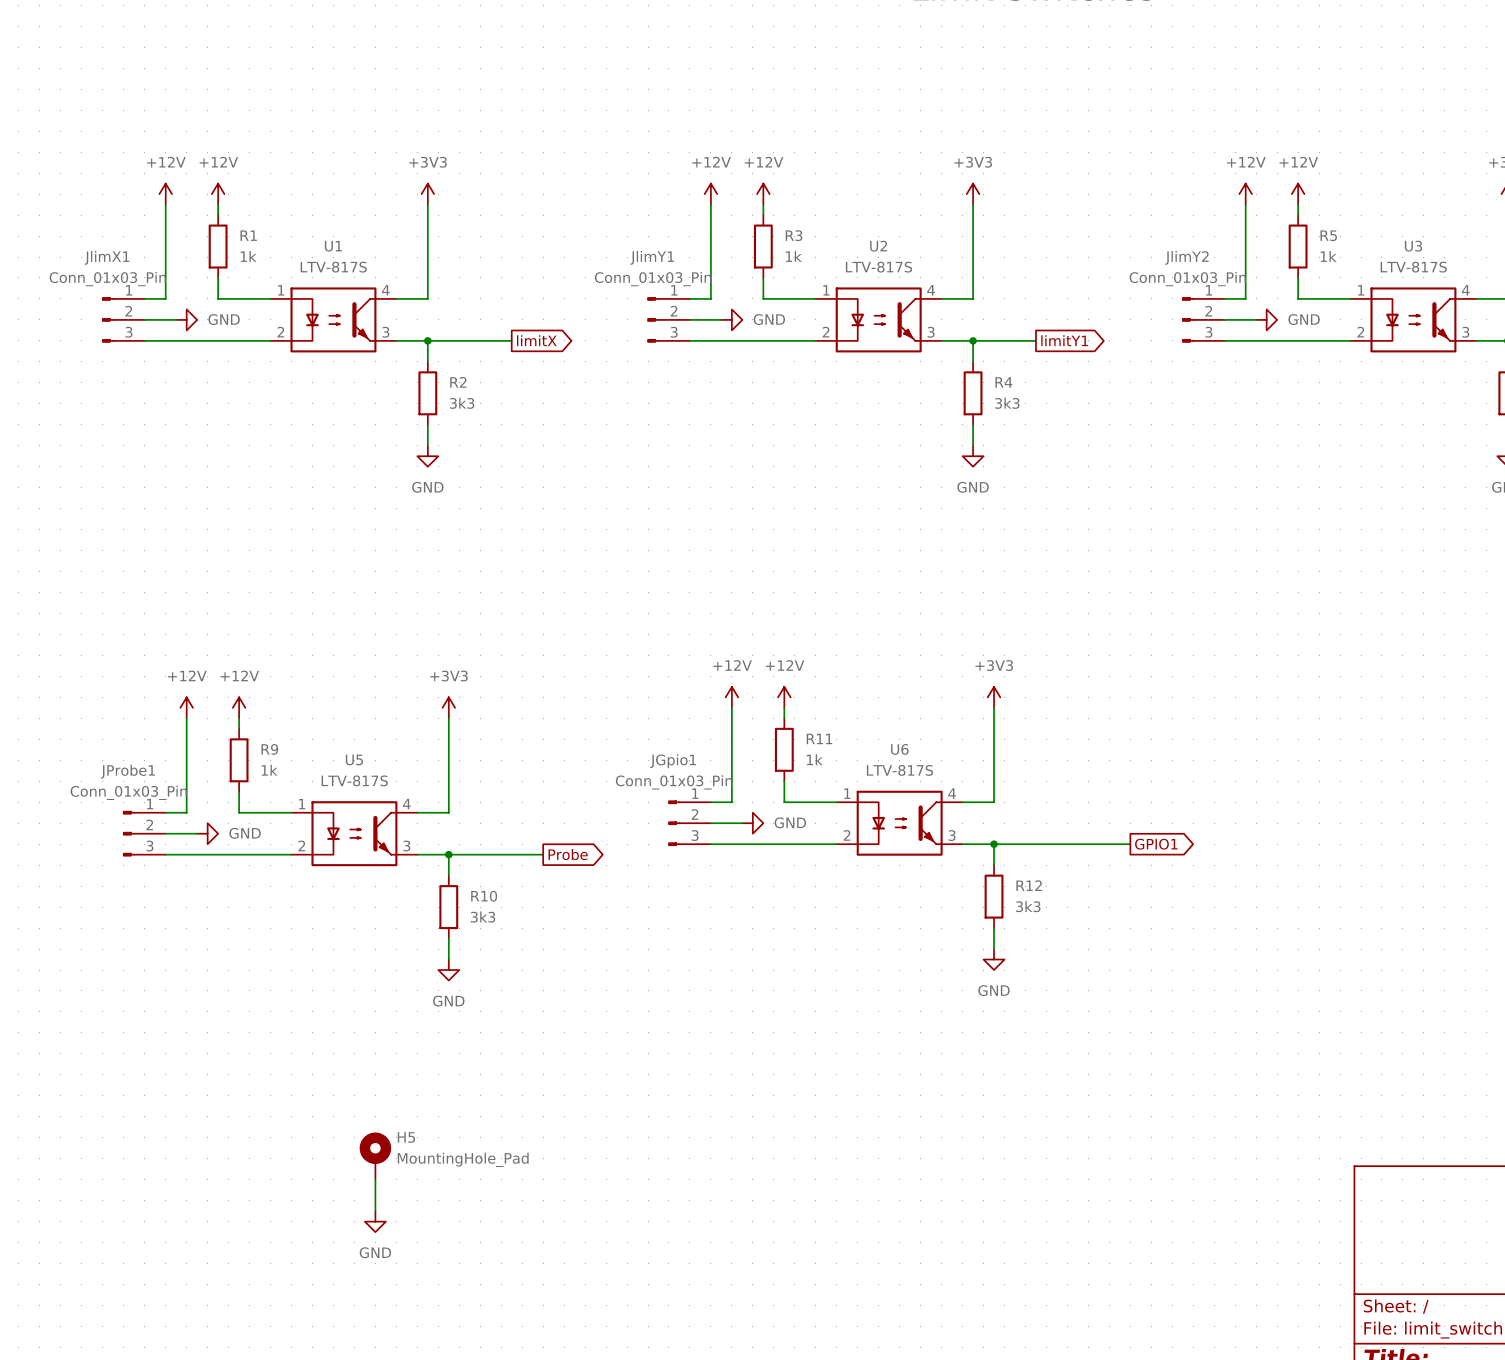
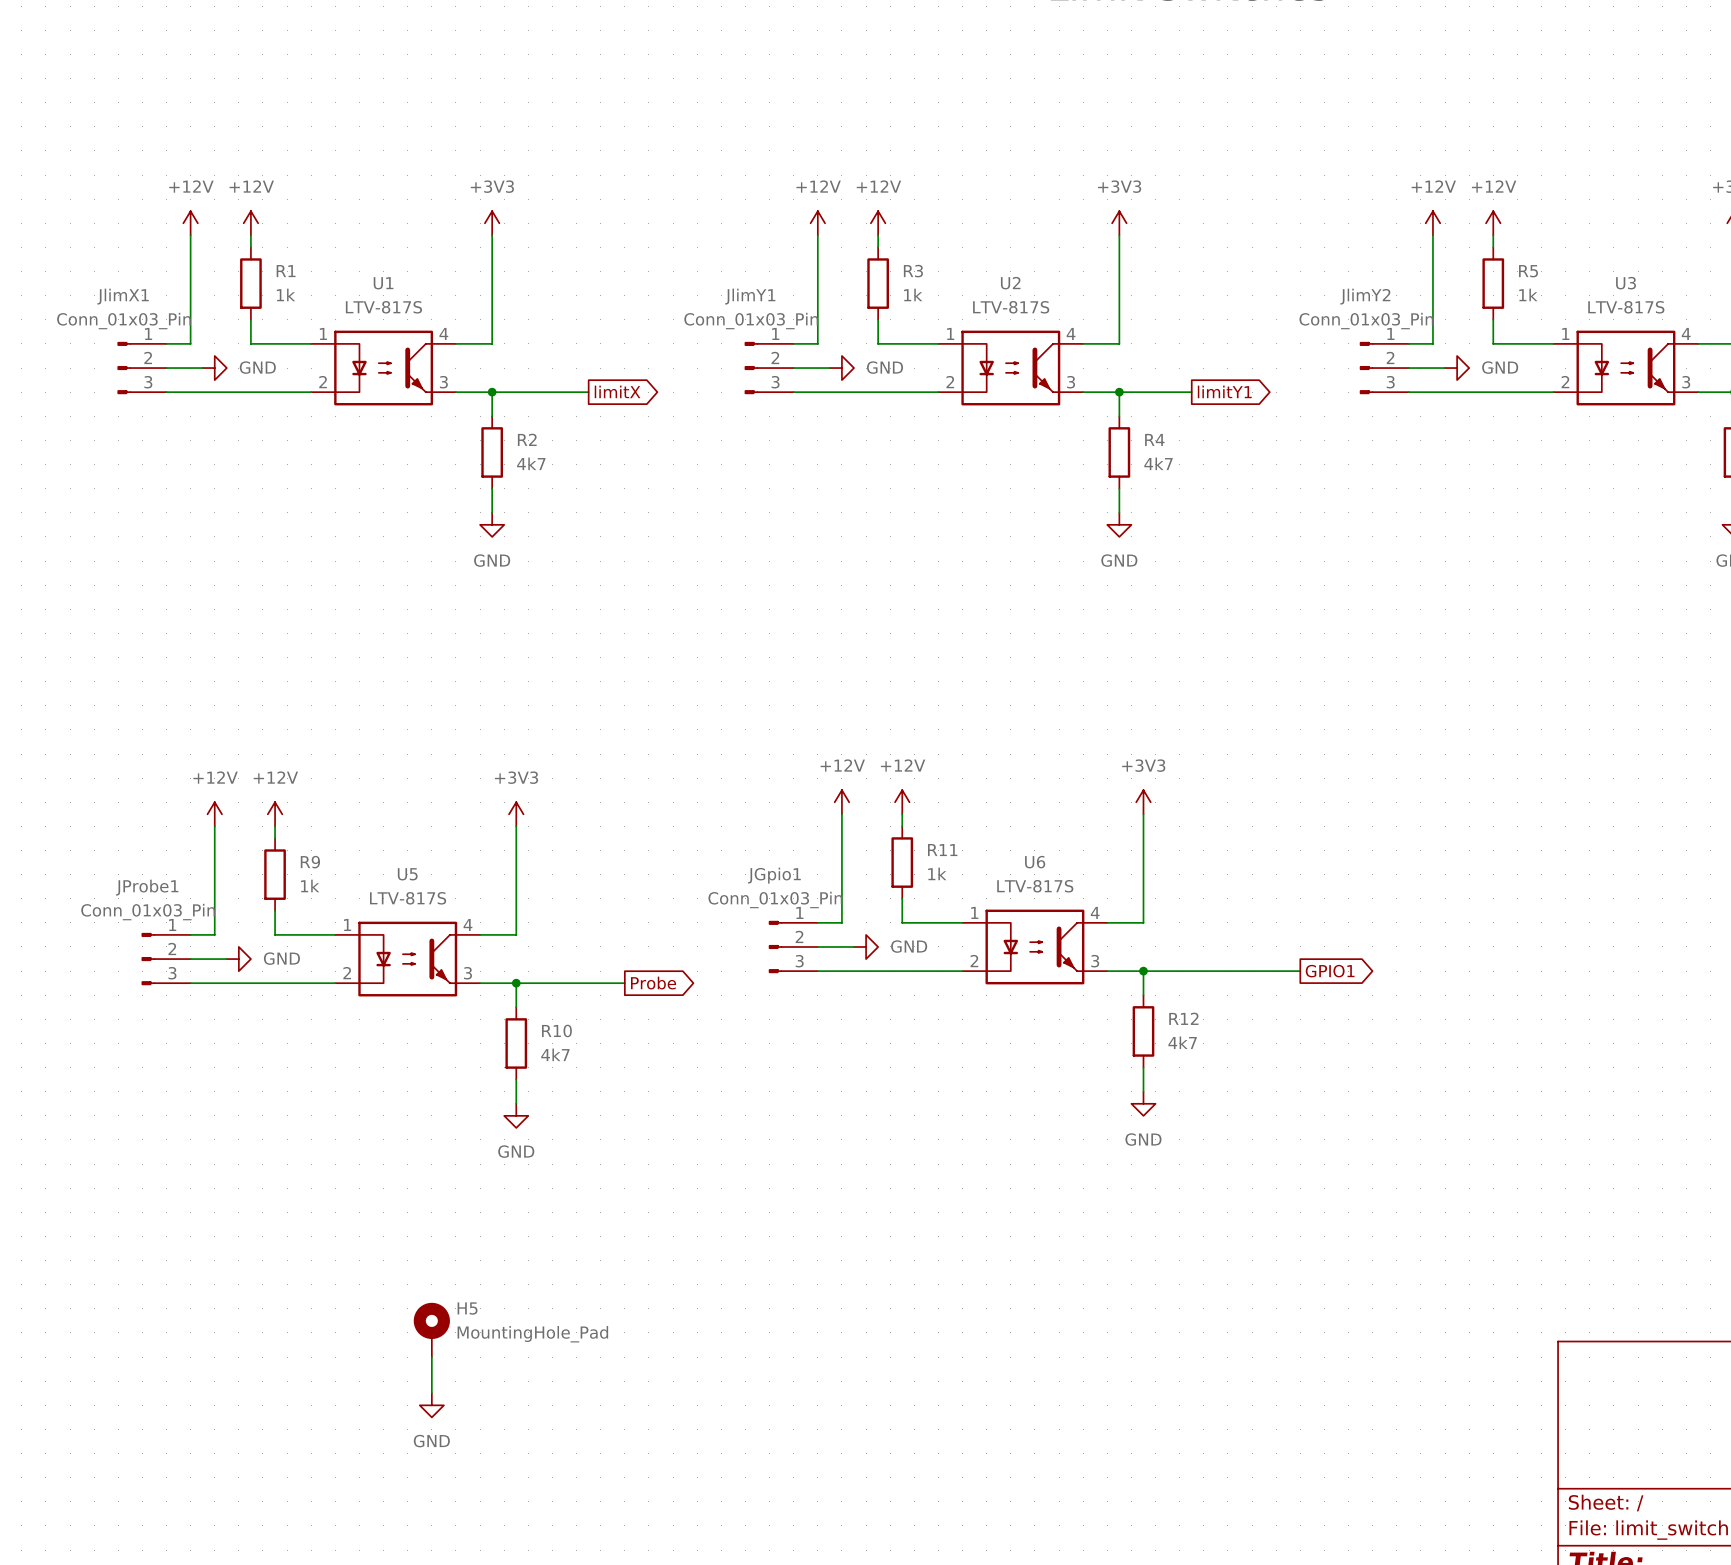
R2 value: 3k3 (462, 403) -> 4k7 (531, 463)
R4 value: 3k3 (1007, 403) -> 4k7 (1158, 463)
R12 value: 3k3 (1028, 906) -> 4k7 (1182, 1042)
R10 value: 3k3 (483, 917) -> 4k7 (555, 1054)

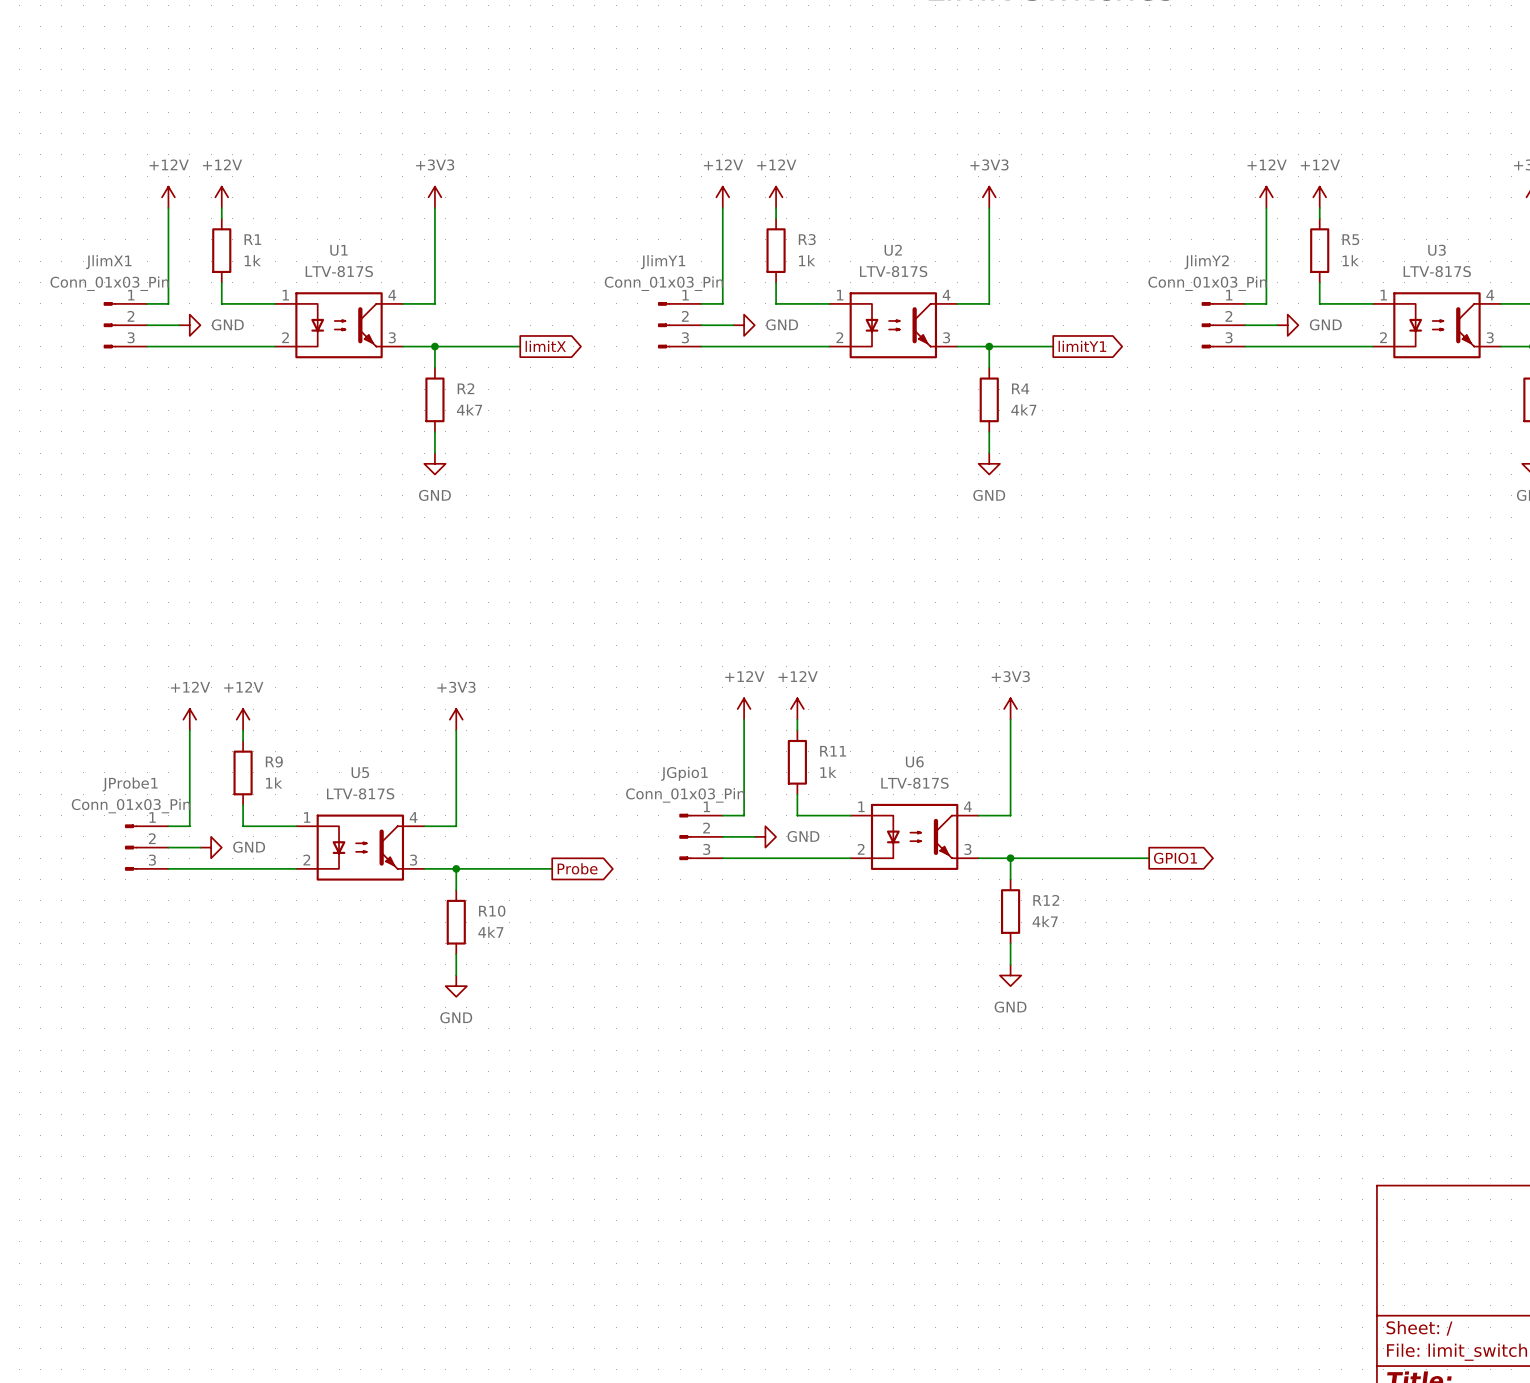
H5: MountingHole_Pad (431, 1329) -> none
wire: (431, 1357) (431, 1393) -> none
power symbol: GND (431, 1405) -> none

